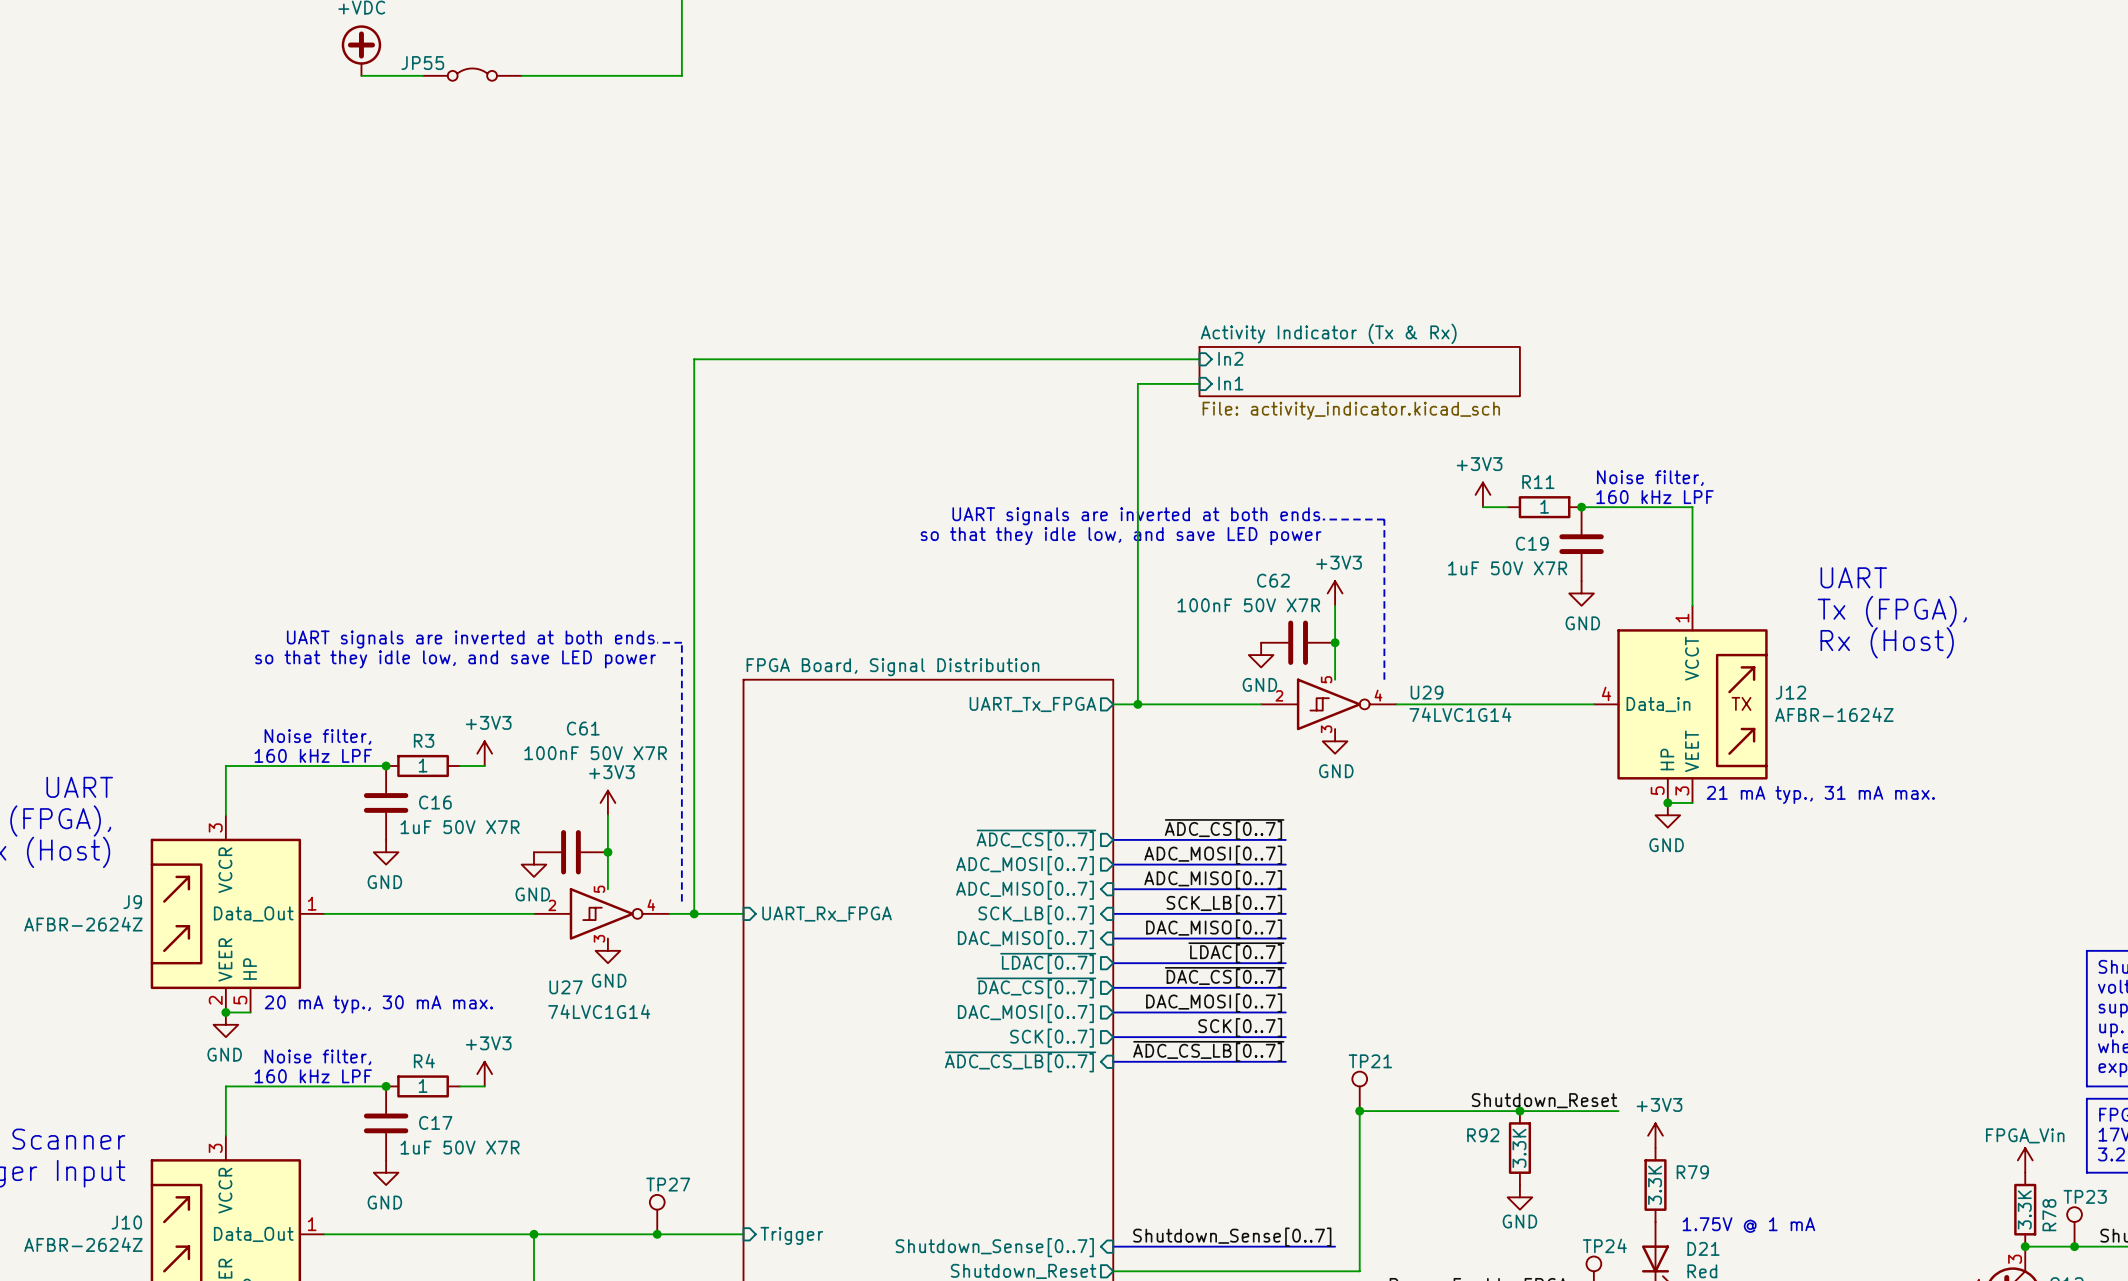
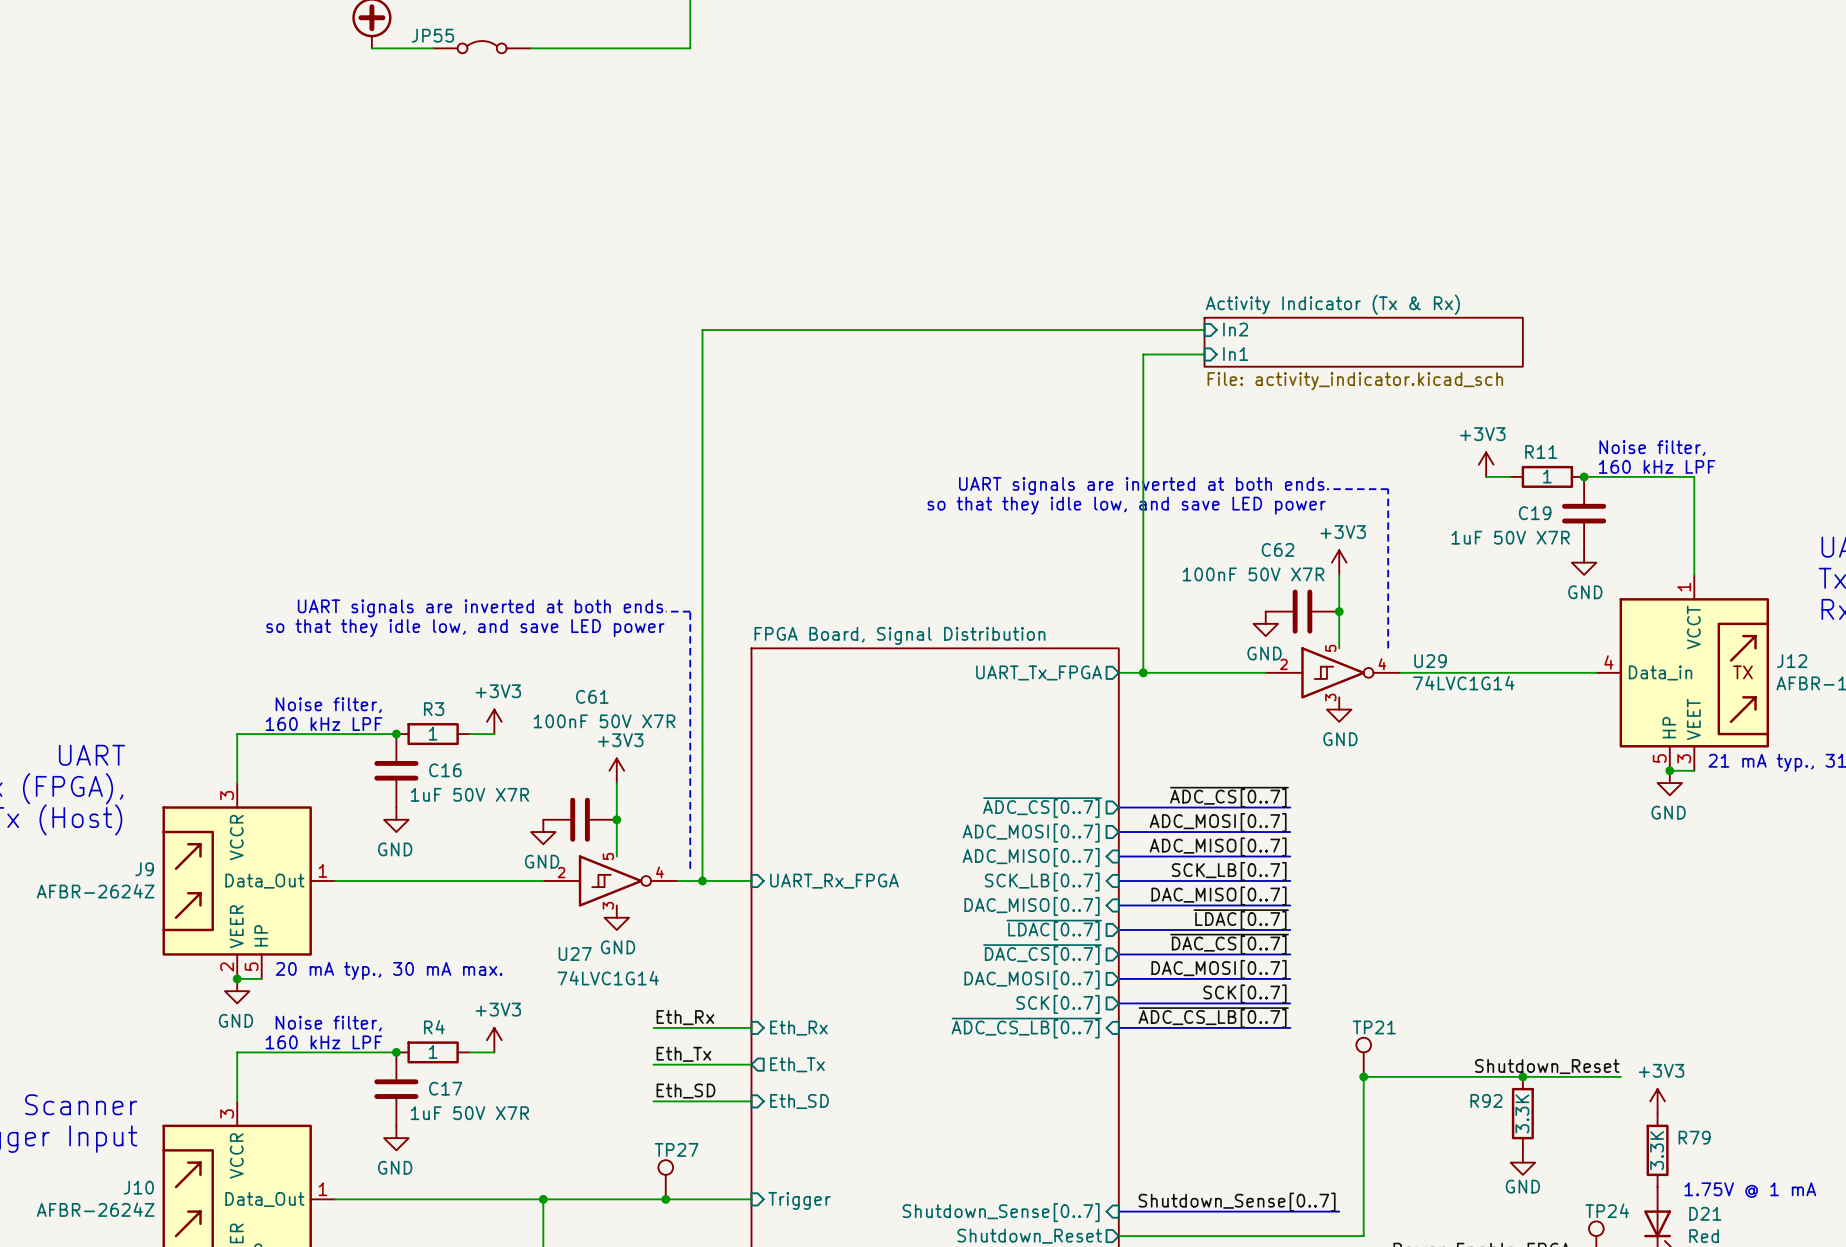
label: none -> Eth_Rx (685, 1017)
wire: none -> (653, 1027) (751, 1027)
sheet pin: none -> Eth_Rx (798, 1028)
label: none -> Eth_Tx (683, 1054)
wire: none -> (653, 1064) (751, 1064)
sheet pin: none -> Eth_Tx (797, 1064)
label: none -> Eth_SD (685, 1091)
wire: none -> (653, 1101) (751, 1101)
sheet pin: none -> Eth_SD (799, 1101)

